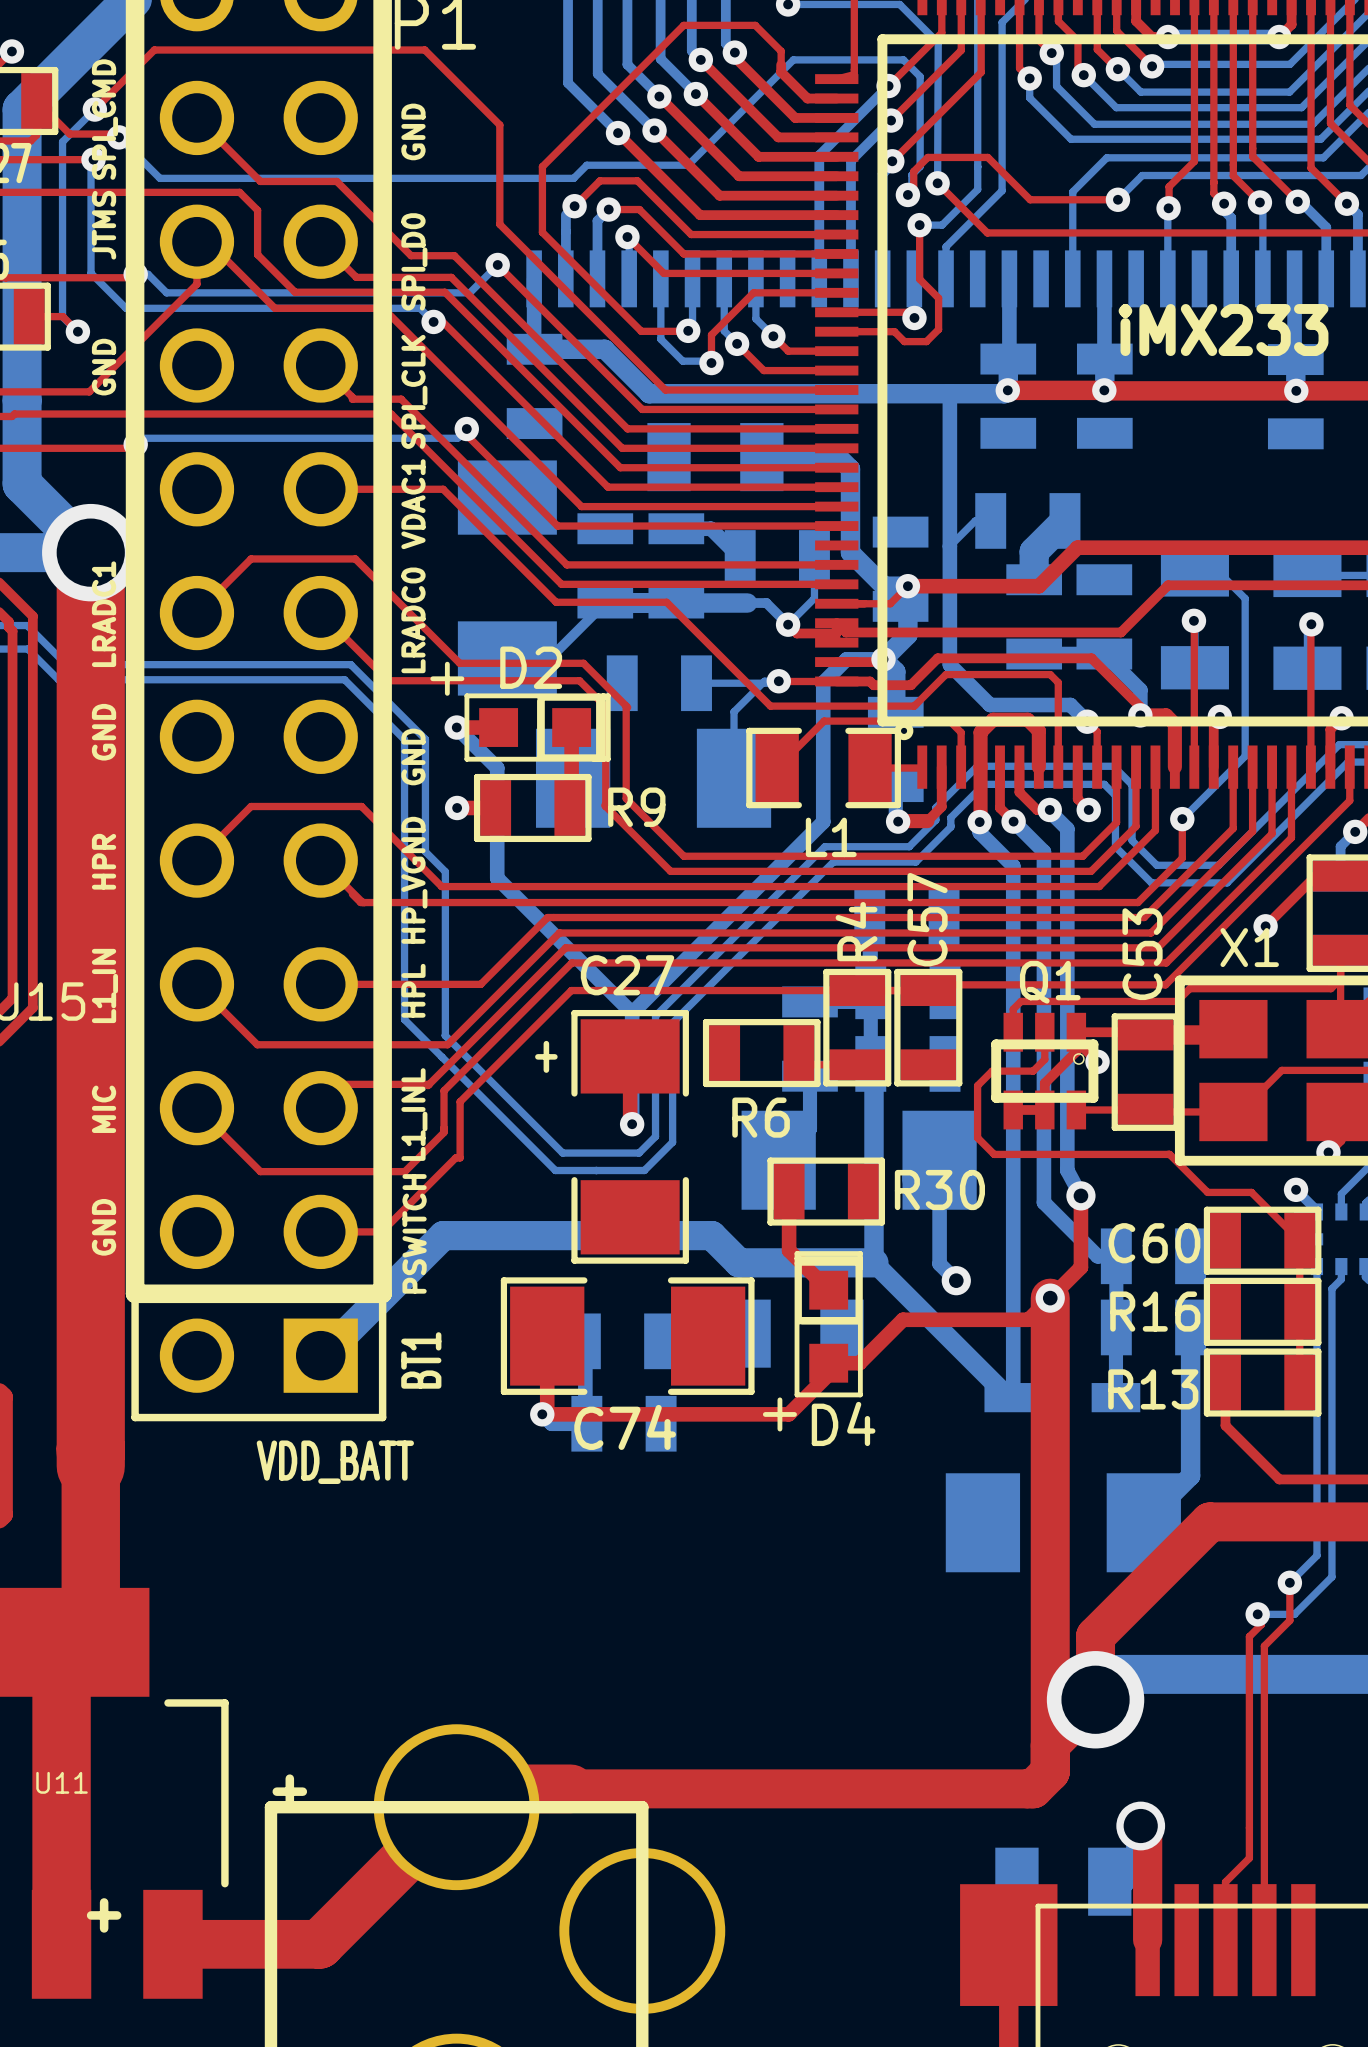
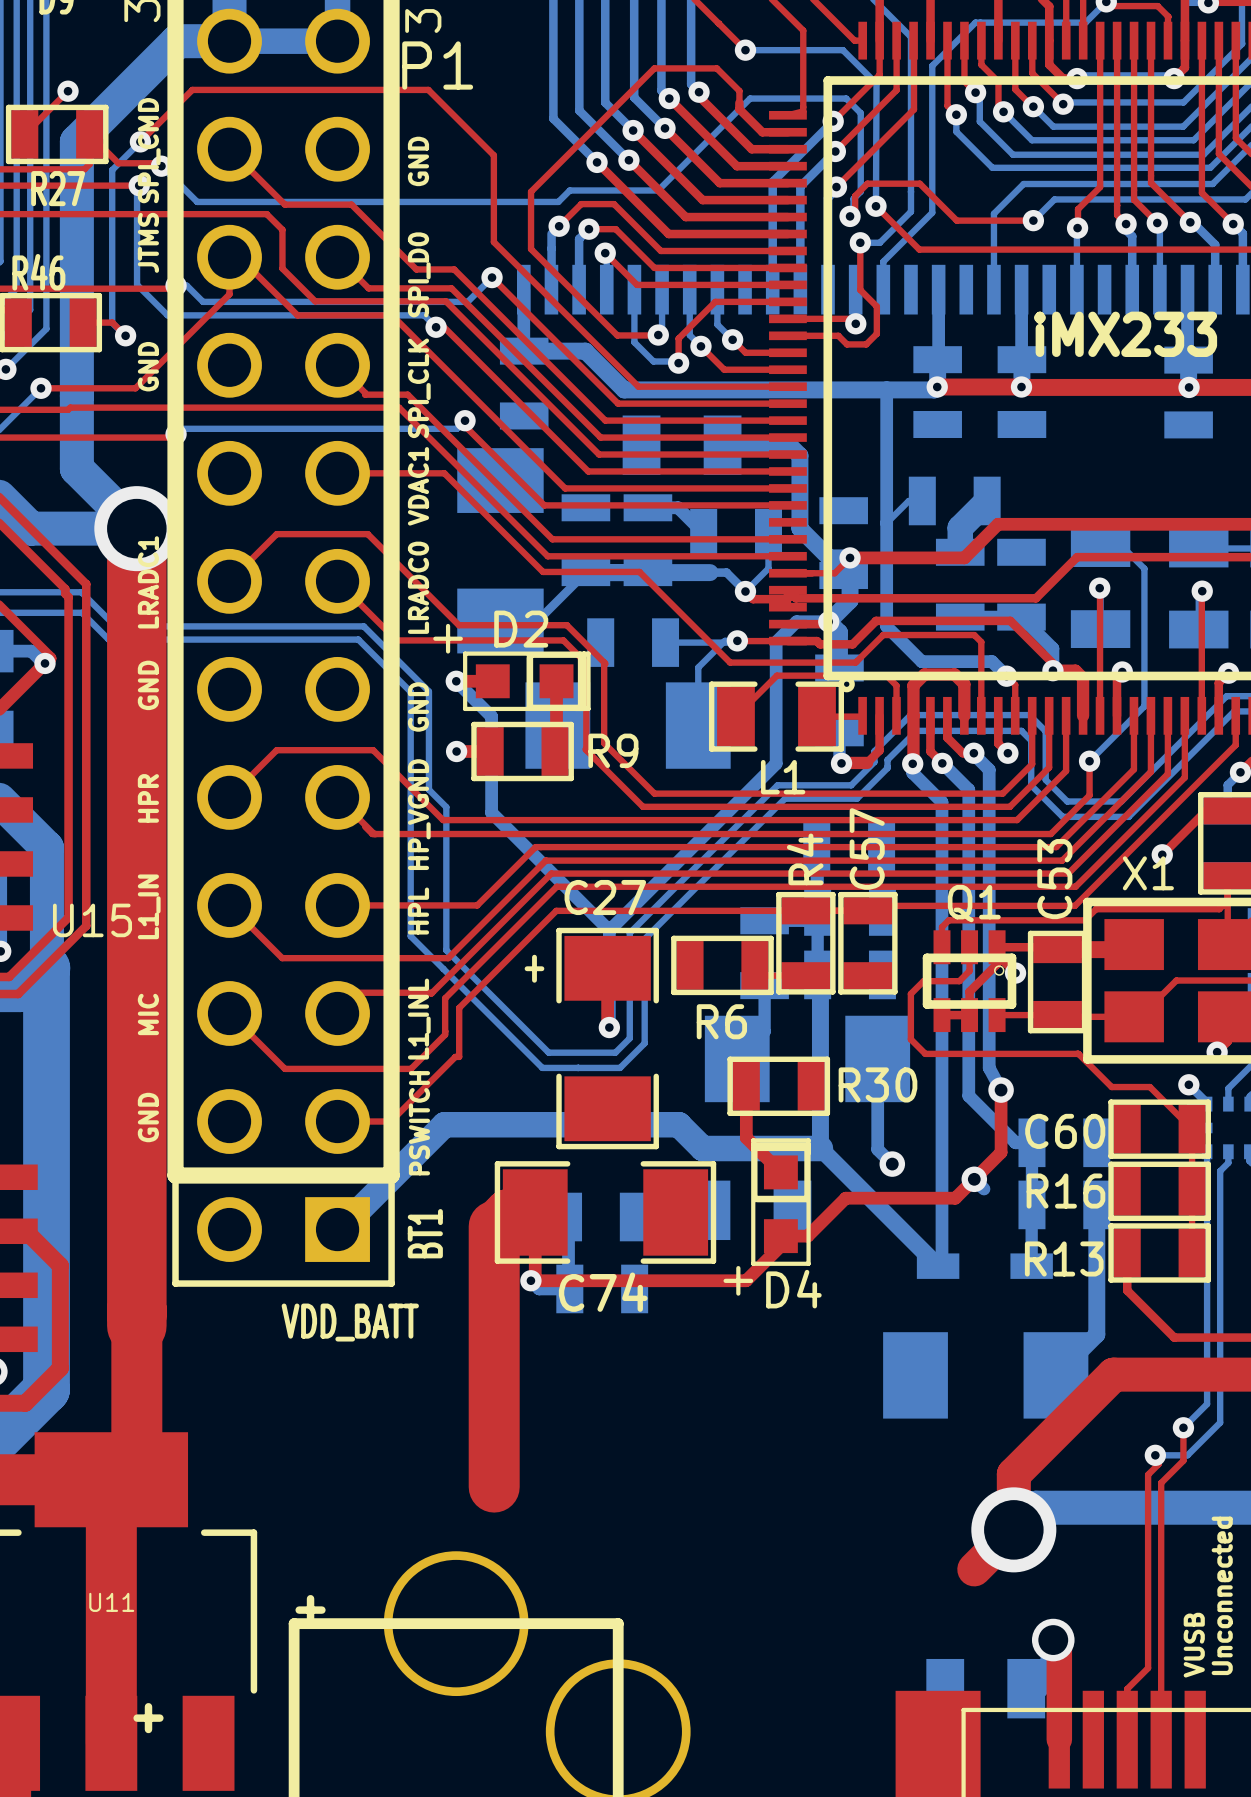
top track: (1050, 1298) (1050, 1771) (1033, 1788) (568, 1788) -> none
top track: none -> (535, 1212) (508, 1212) (494, 1226) (494, 1487)
text: none -> Unconnected (1222, 1595)
top track: (570, 1788) (474, 1788) (319, 1944) (172, 1944) -> none
text: none -> VUSB (1194, 1645)

